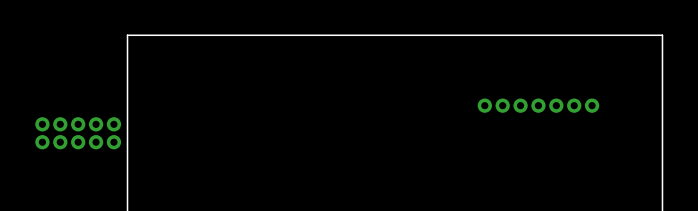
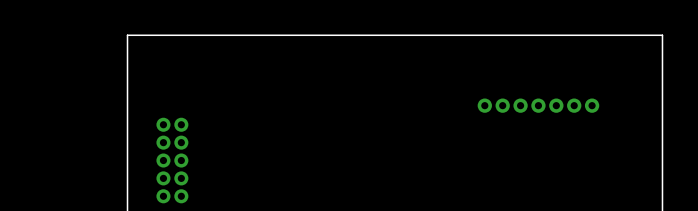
part: (78, 133) -> none
part: none -> (172, 160)

